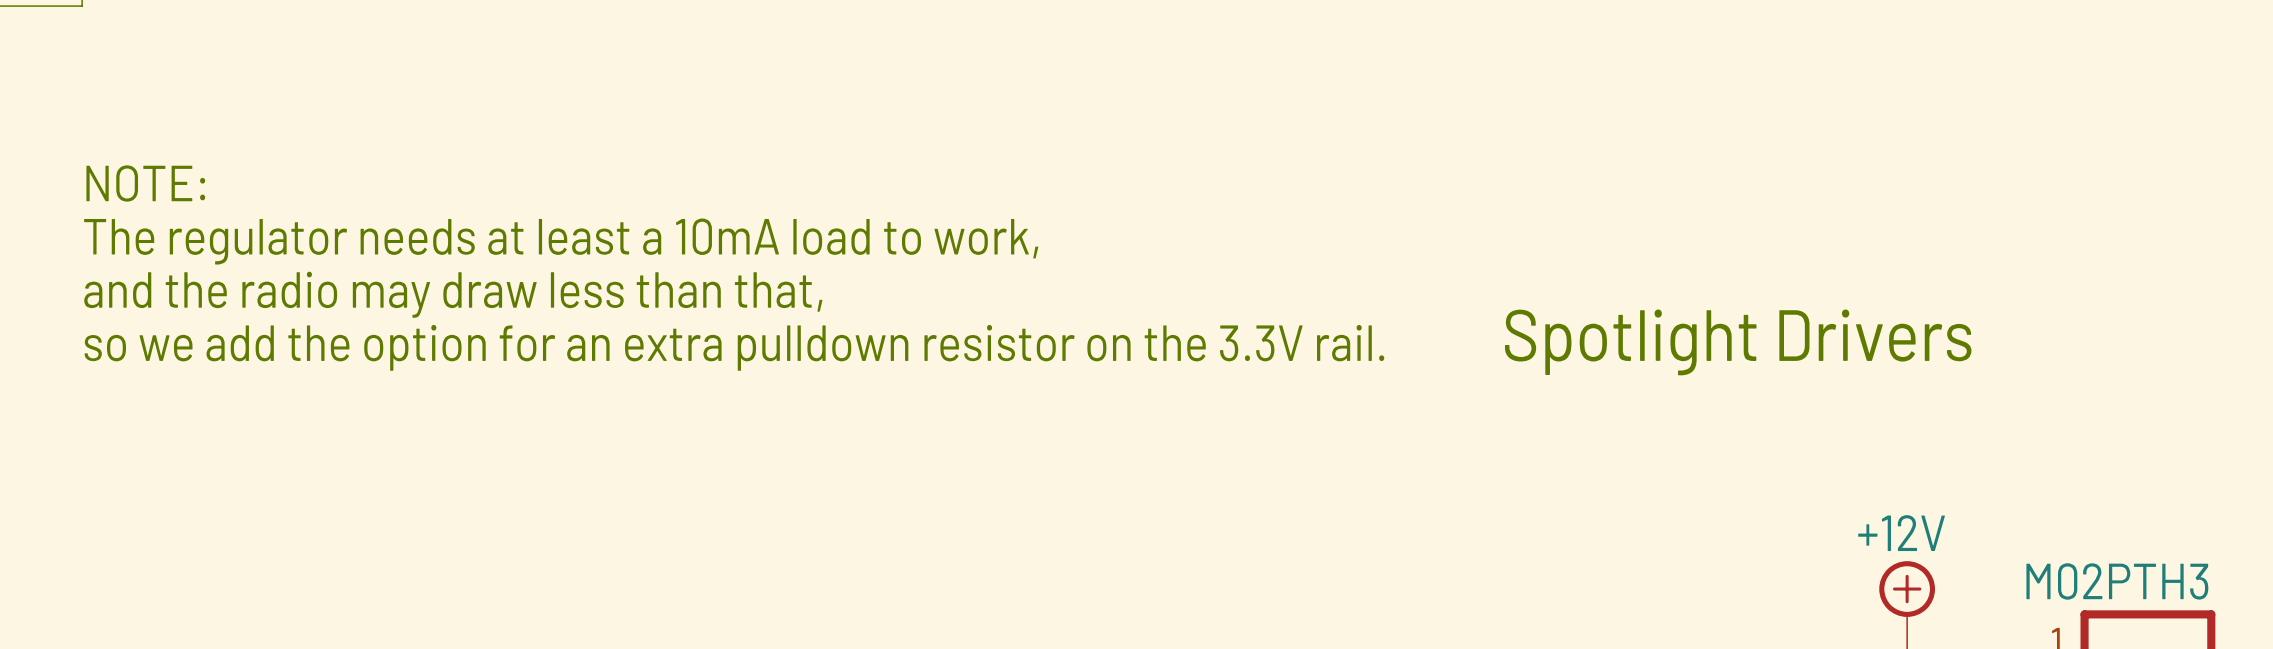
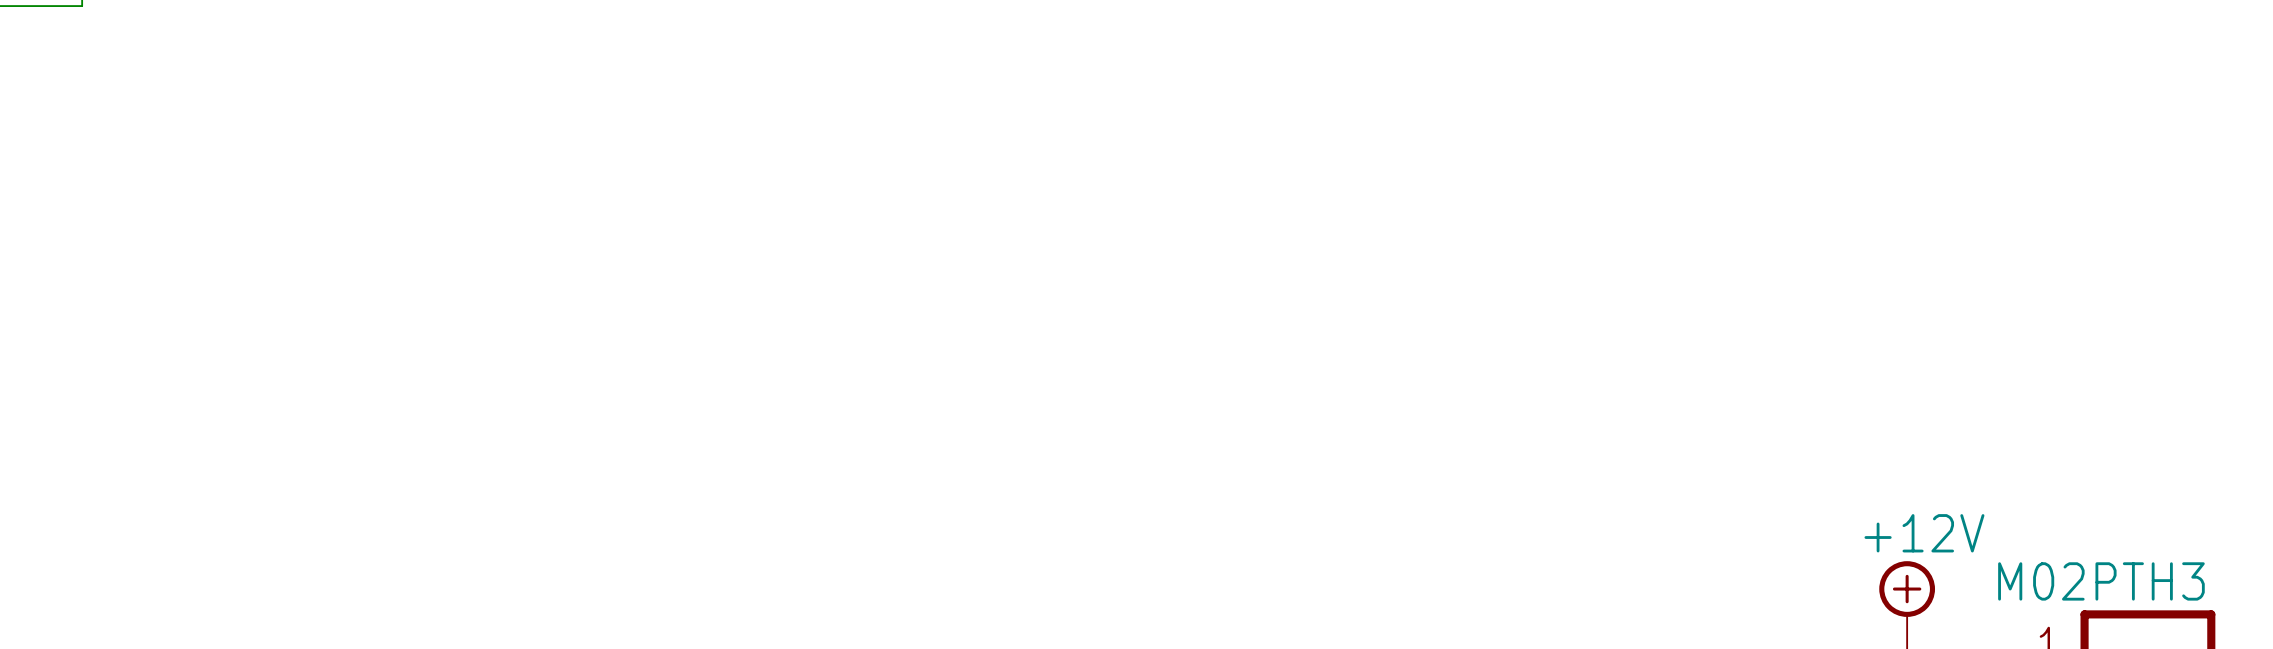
text: NOTE: (145, 183) -> none
text: The regulator needs at least a 10mA load to work, (561, 241) -> none
text: and the radio may draw less than that, (453, 294) -> none
text: Spotlight Drivers (1738, 342) -> none
text: so we add the option for an extra pulldown resistor on the 3.3V rail. (734, 347) -> none

